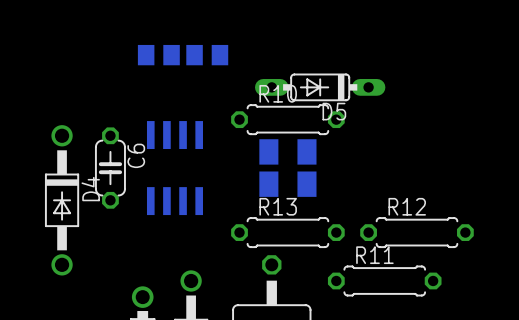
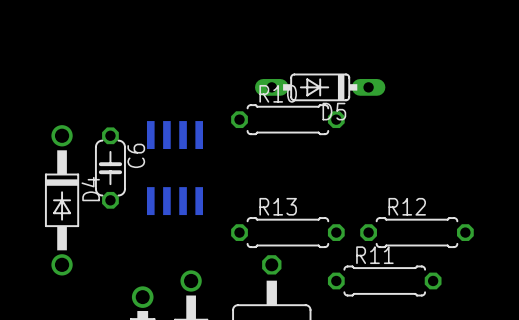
part: (158, 55) -> none
part: (207, 55) -> none
part: (287, 151) -> none
part: (287, 184) -> none

